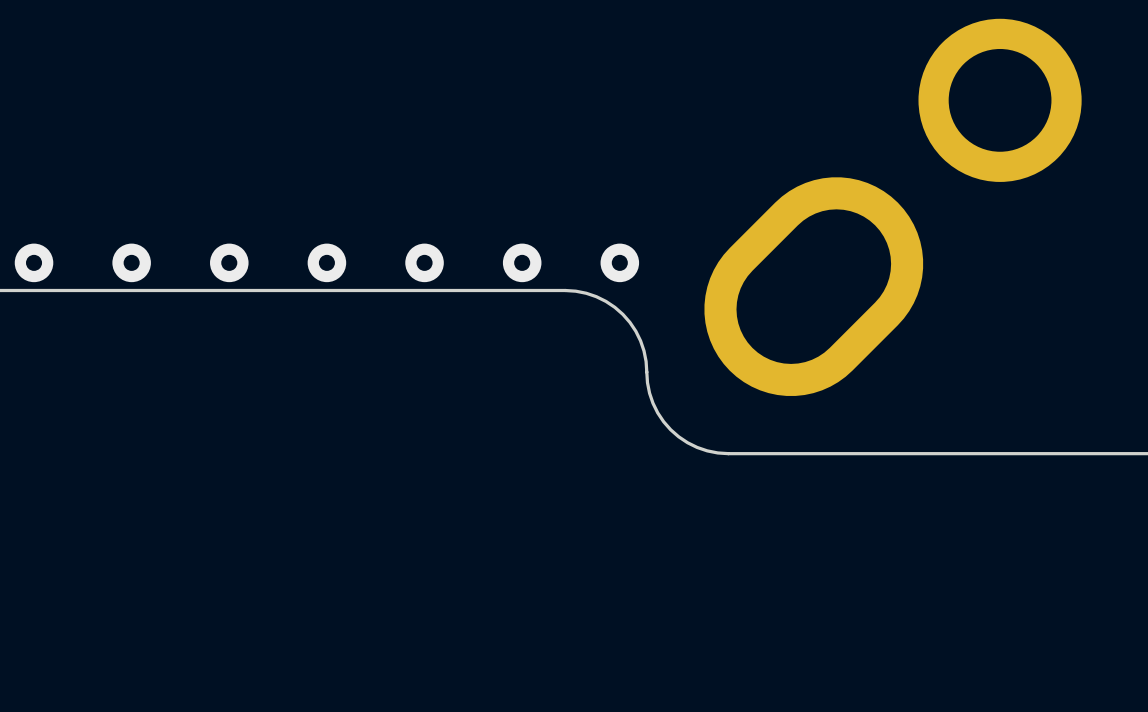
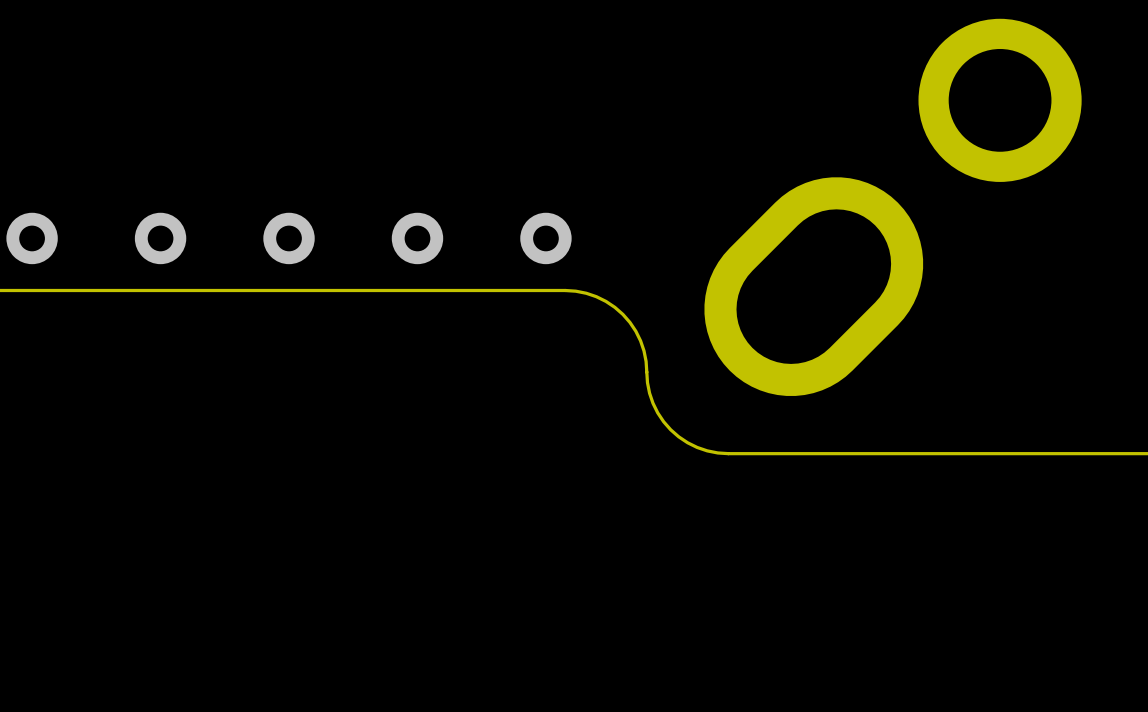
via size: [14, 243, 54, 283] -> [6, 212, 58, 265]
via size: [405, 243, 444, 283] -> [391, 212, 444, 265]
via position: (131, 262) -> (160, 238)
via: (229, 262) -> none
via position: (326, 262) -> (289, 238)
via position: (522, 262) -> (545, 238)
via: (619, 262) -> none

